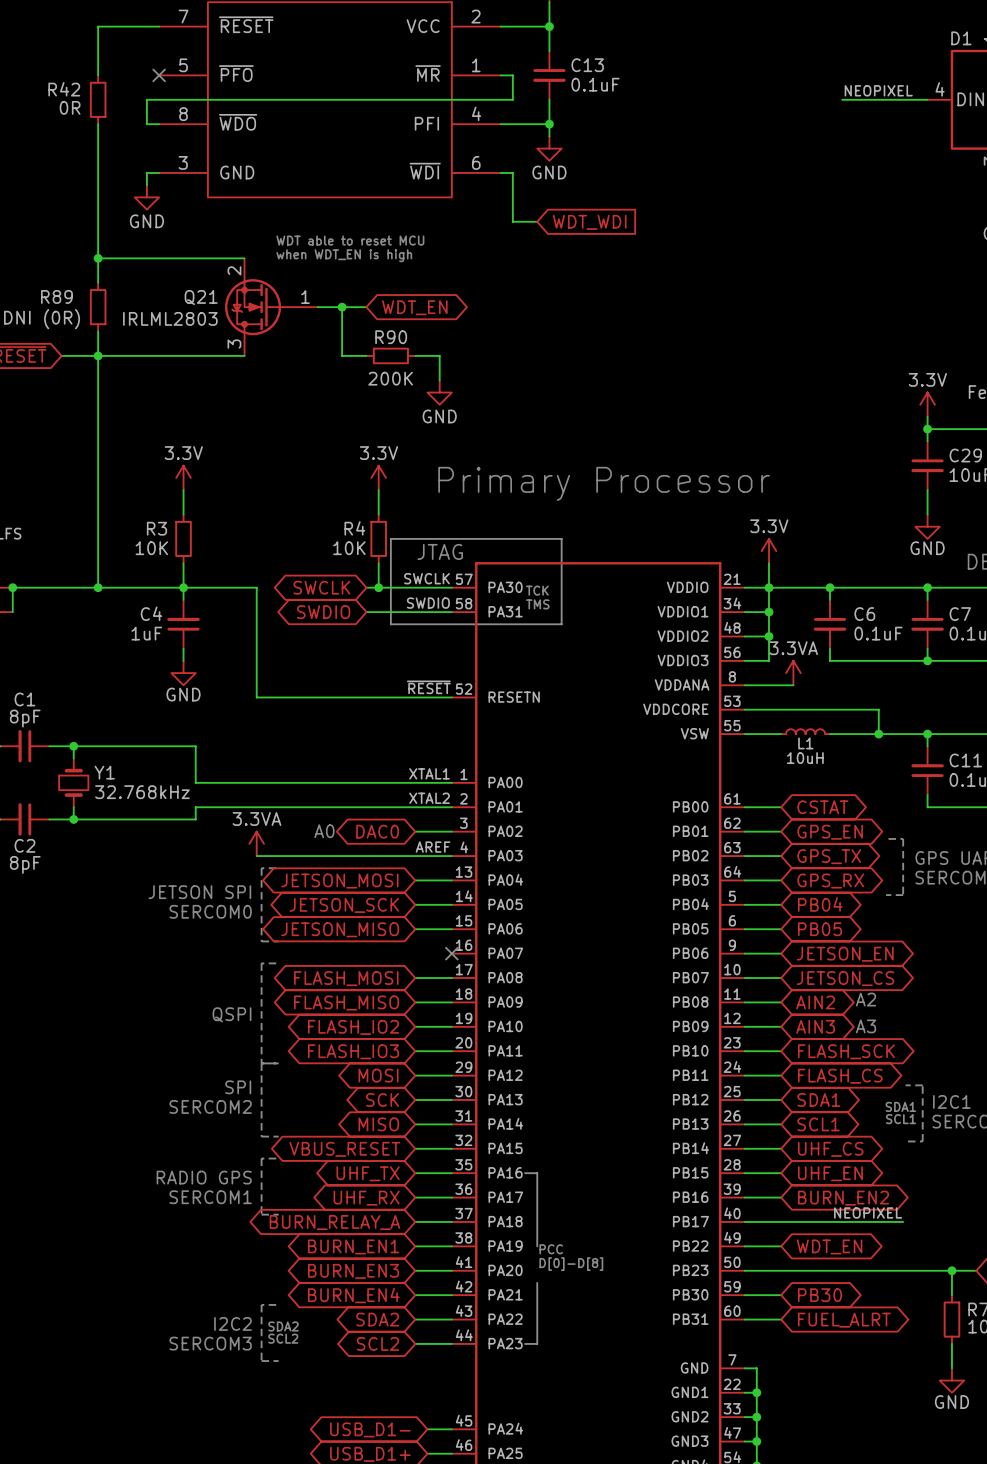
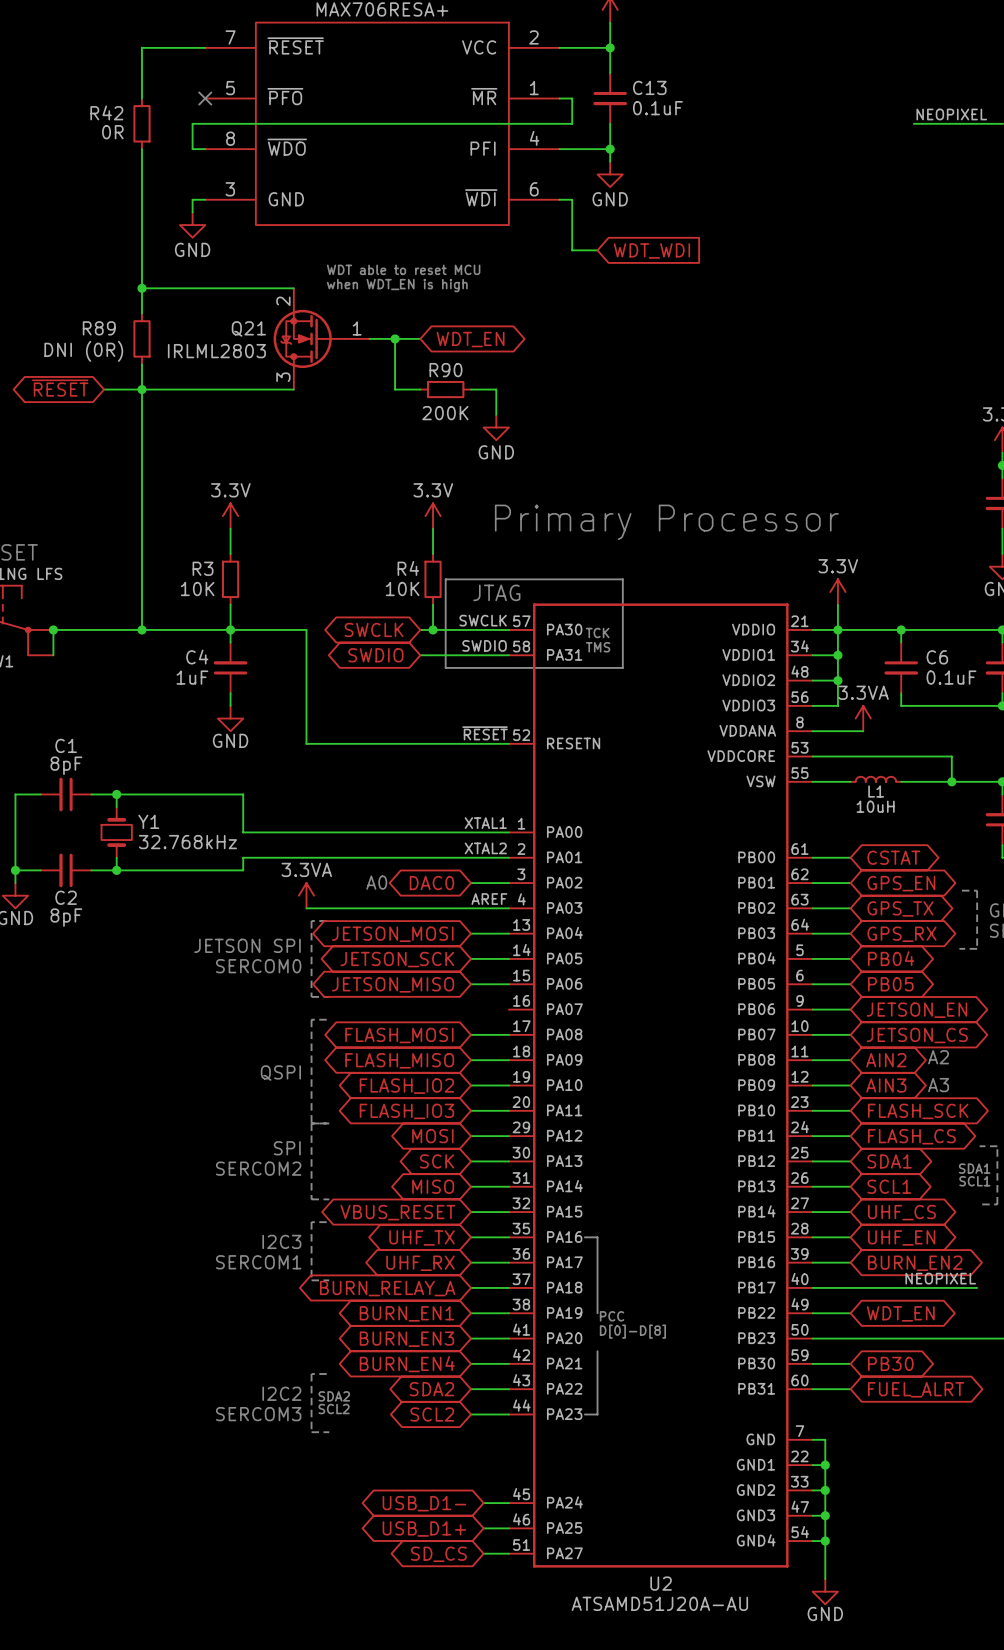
no-connect mark: (451, 953) -> none
text: RADIO GPS (204, 1177) -> I2C3 (281, 1241)

